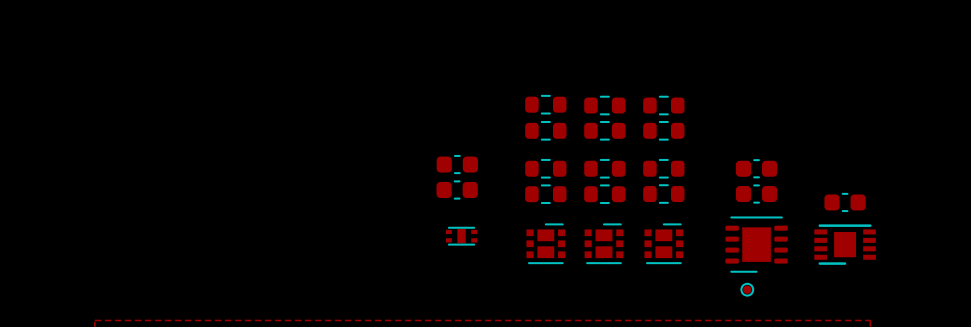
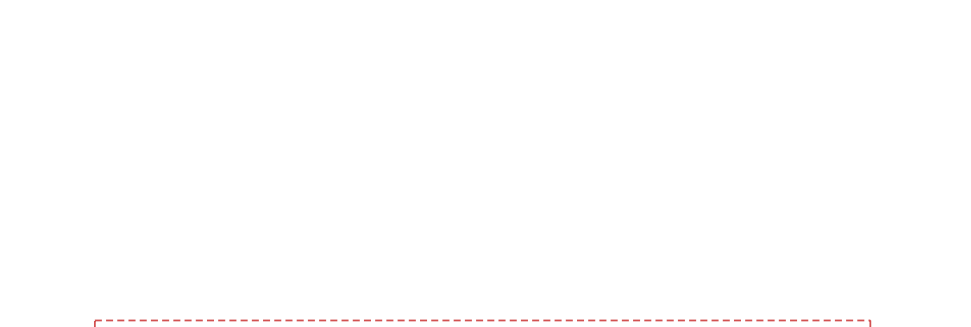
part: (545, 104) -> none
part: (604, 105) -> none
part: (663, 105) -> none
part: (545, 130) -> none
part: (604, 130) -> none
part: (663, 130) -> none
part: (457, 164) -> none
part: (545, 168) -> none
part: (604, 168) -> none
part: (663, 168) -> none
part: (756, 168) -> none
part: (457, 189) -> none
part: (545, 194) -> none
part: (604, 194) -> none
part: (663, 194) -> none
part: (756, 194) -> none
part: (845, 202) -> none
part: (461, 236) -> none
part: (545, 243) -> none
part: (603, 243) -> none
part: (663, 243) -> none
part: (756, 244) -> none
part: (845, 244) -> none
part: (747, 289) -> none

